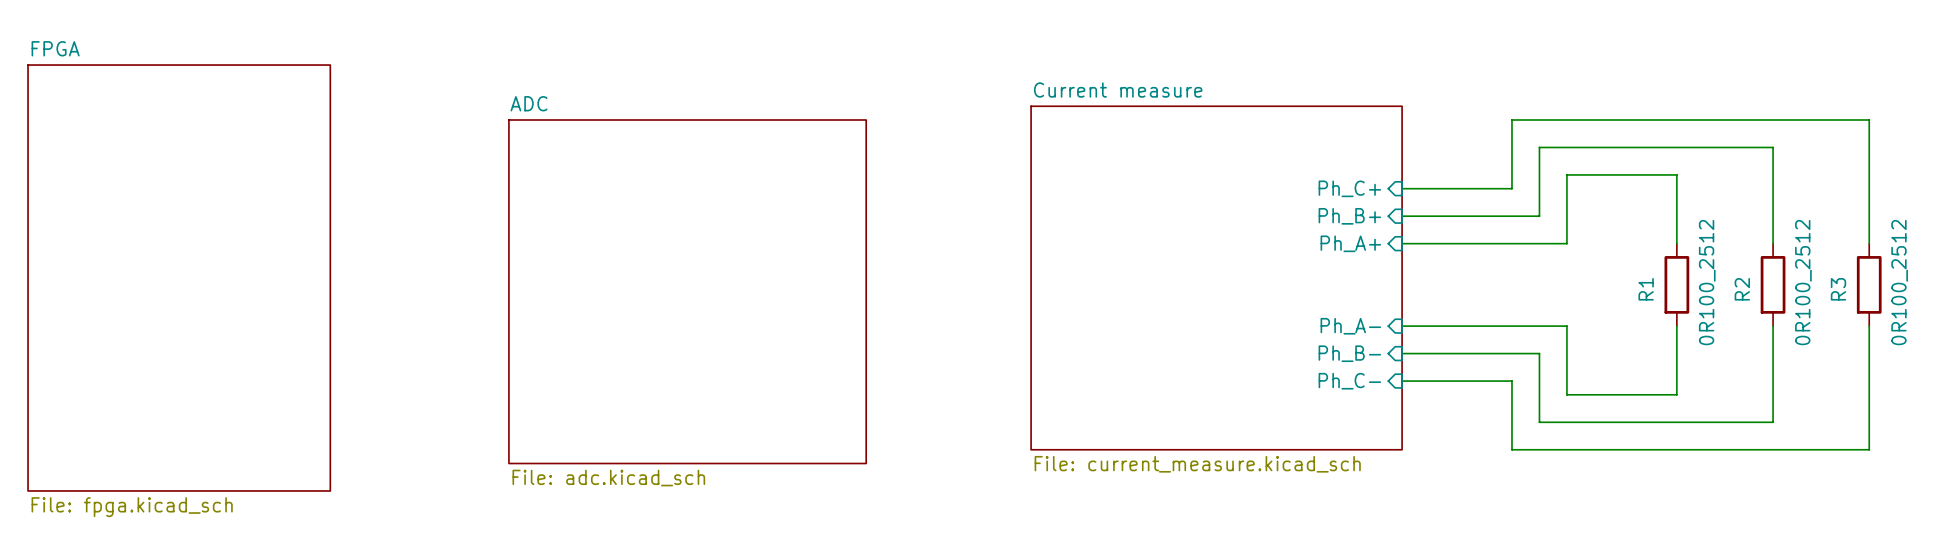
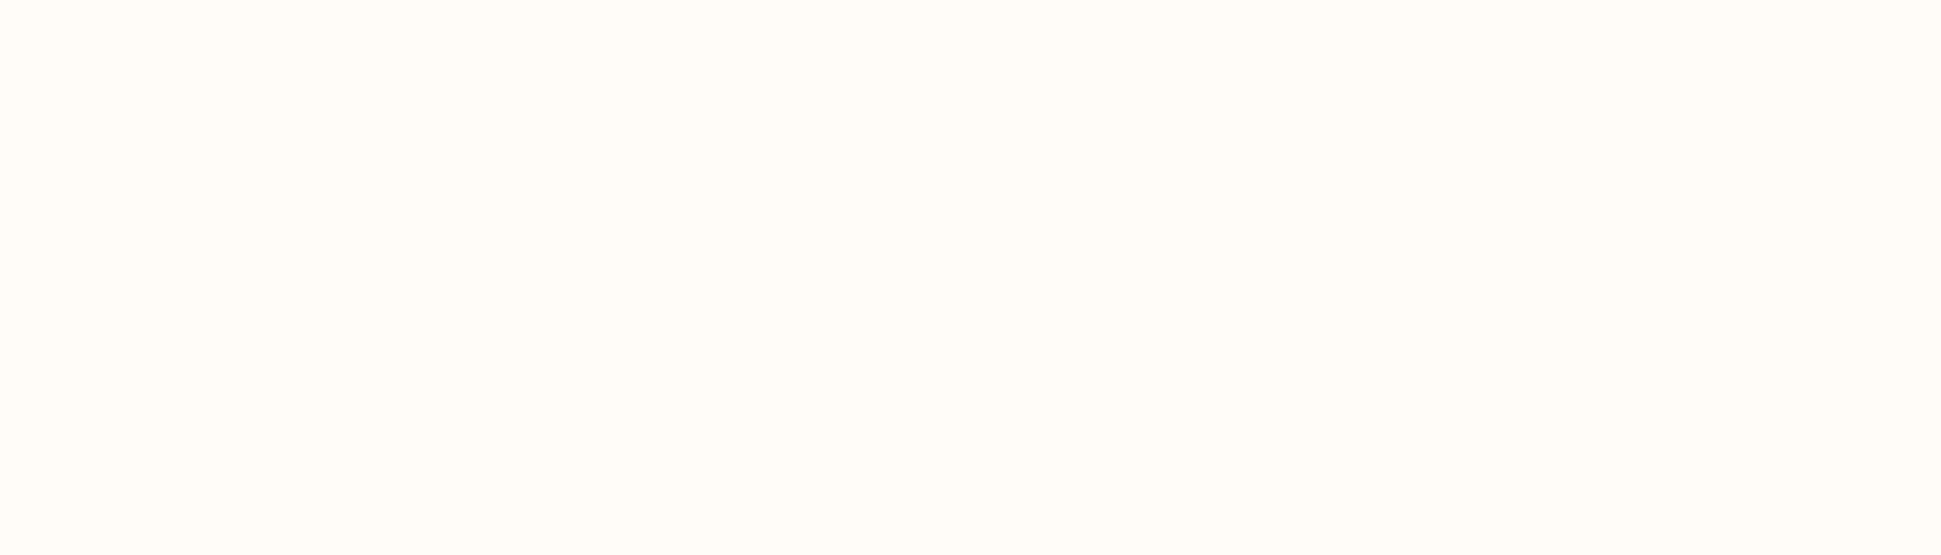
sheet pin: Ph_C+ (1349, 188) -> none
wire: (1402, 188) (1511, 188) (1511, 120) (1869, 120) (1869, 243) -> none
sheet pin: Ph_B+ (1349, 216) -> none
wire: (1402, 216) (1539, 216) (1539, 147) (1773, 147) (1773, 243) -> none
sheet pin: Ph_A+ (1350, 243) -> none
wire: (1402, 243) (1566, 243) (1566, 174) (1676, 174) (1676, 243) -> none
sheet FPGA: File: fpga.kicad_sch (179, 278) -> none
sheet Current measure: File: current_measure.kicad_sch (1216, 278) -> none
R1: 0R100_2512 (1676, 284) -> none
R2: 0R100_2512 (1773, 284) -> none
R3: 0R100_2512 (1869, 284) -> none
sheet ADC: File: adc.kicad_sch (687, 291) -> none
sheet pin: Ph_A- (1350, 326) -> none
wire: (1402, 326) (1566, 326) (1566, 394) (1676, 394) (1676, 326) -> none
wire: (1773, 326) (1773, 422) (1539, 422) (1539, 353) (1402, 353) -> none
wire: (1869, 326) (1869, 449) (1511, 449) (1511, 381) (1402, 381) -> none
sheet pin: Ph_B- (1349, 353) -> none
sheet pin: Ph_C- (1349, 381) -> none

